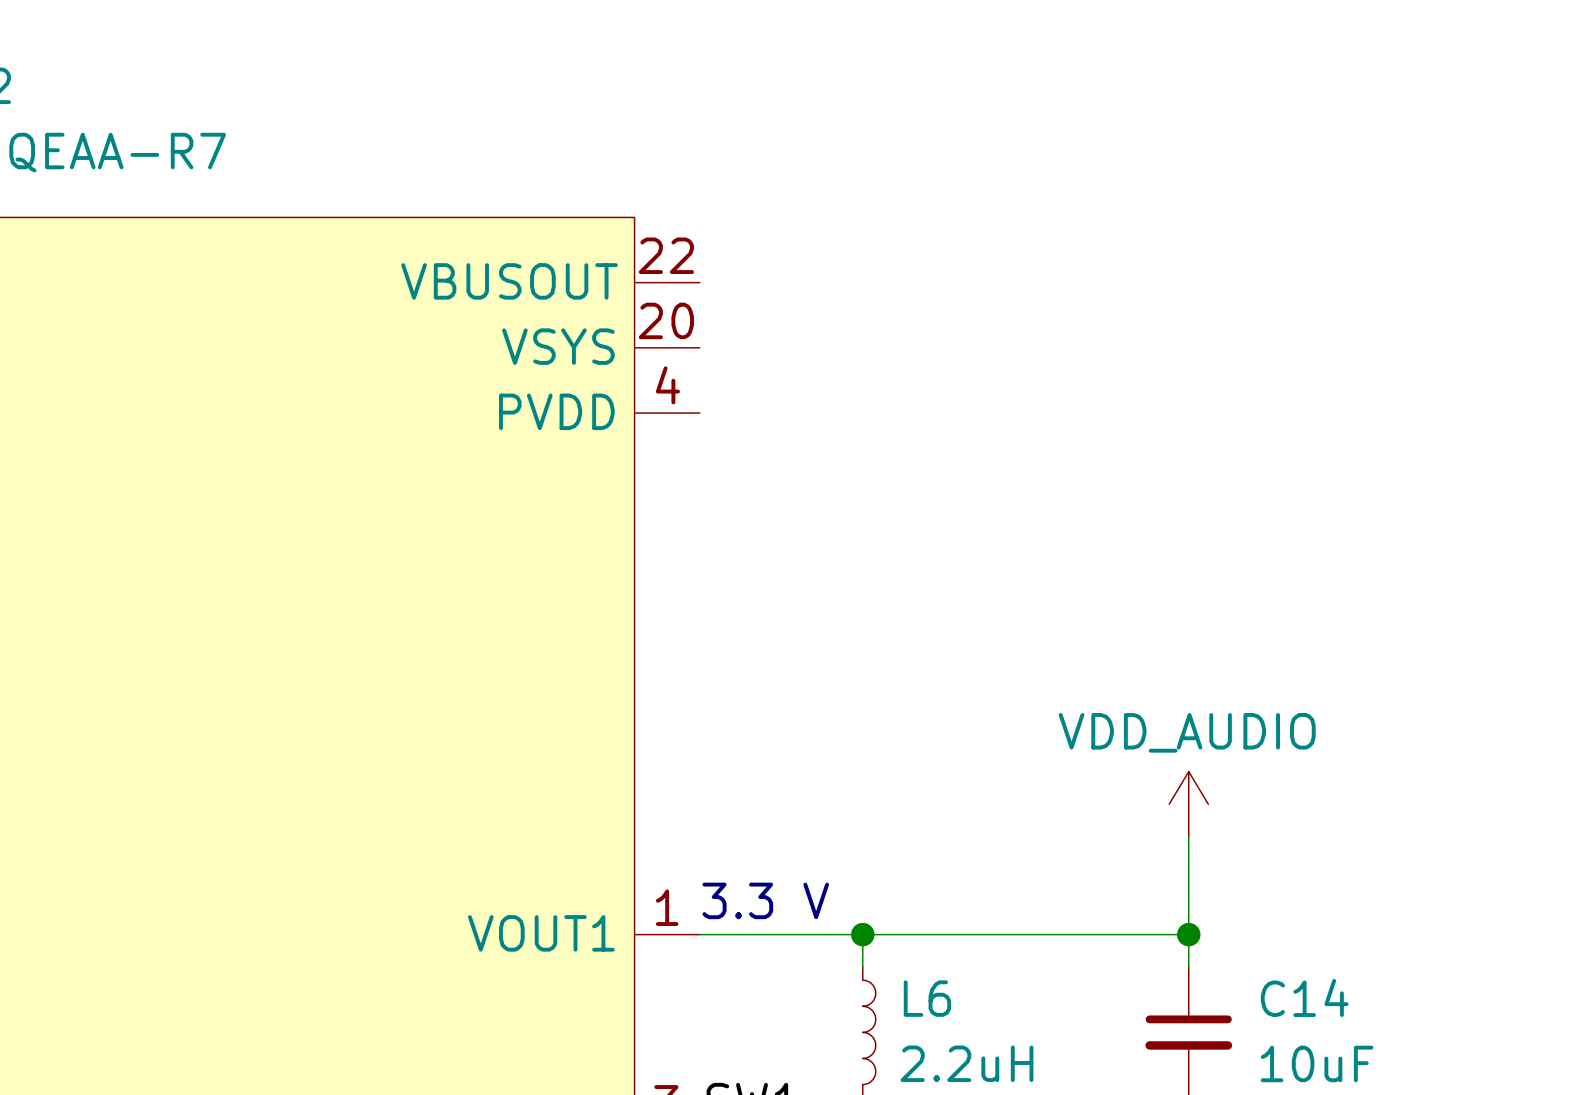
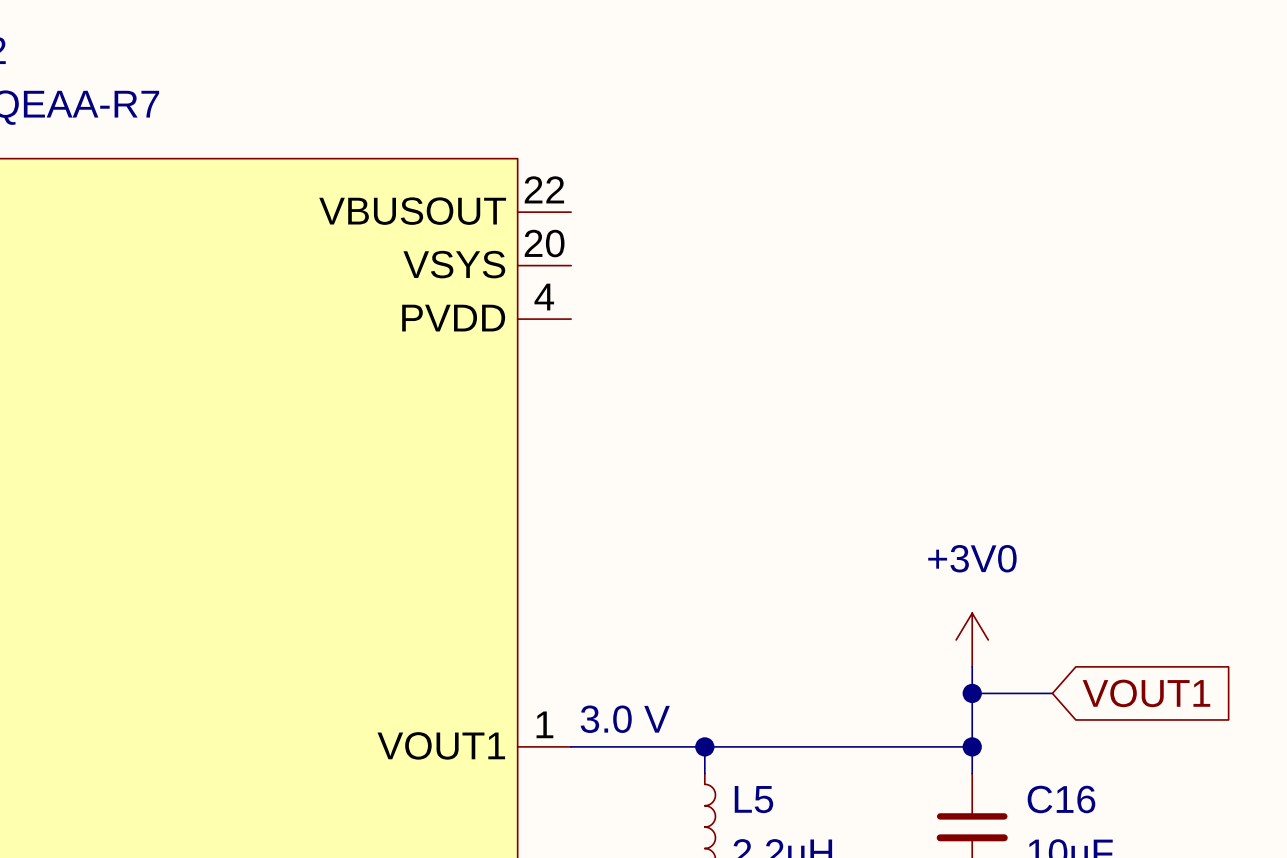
power symbol: VDD_AUDIO (1188, 804) -> +3V0 (972, 639)
wire: none -> (972, 693) (1052, 693)
junction: none -> (972, 693)
global label: none -> VOUT1 (1146, 693)
text: 3.3 V (765, 900) -> 3.0 V (625, 719)
C14 name: C14 (1304, 997) -> C16 (1061, 799)
L6 name: L6 (927, 998) -> L5 (753, 799)

